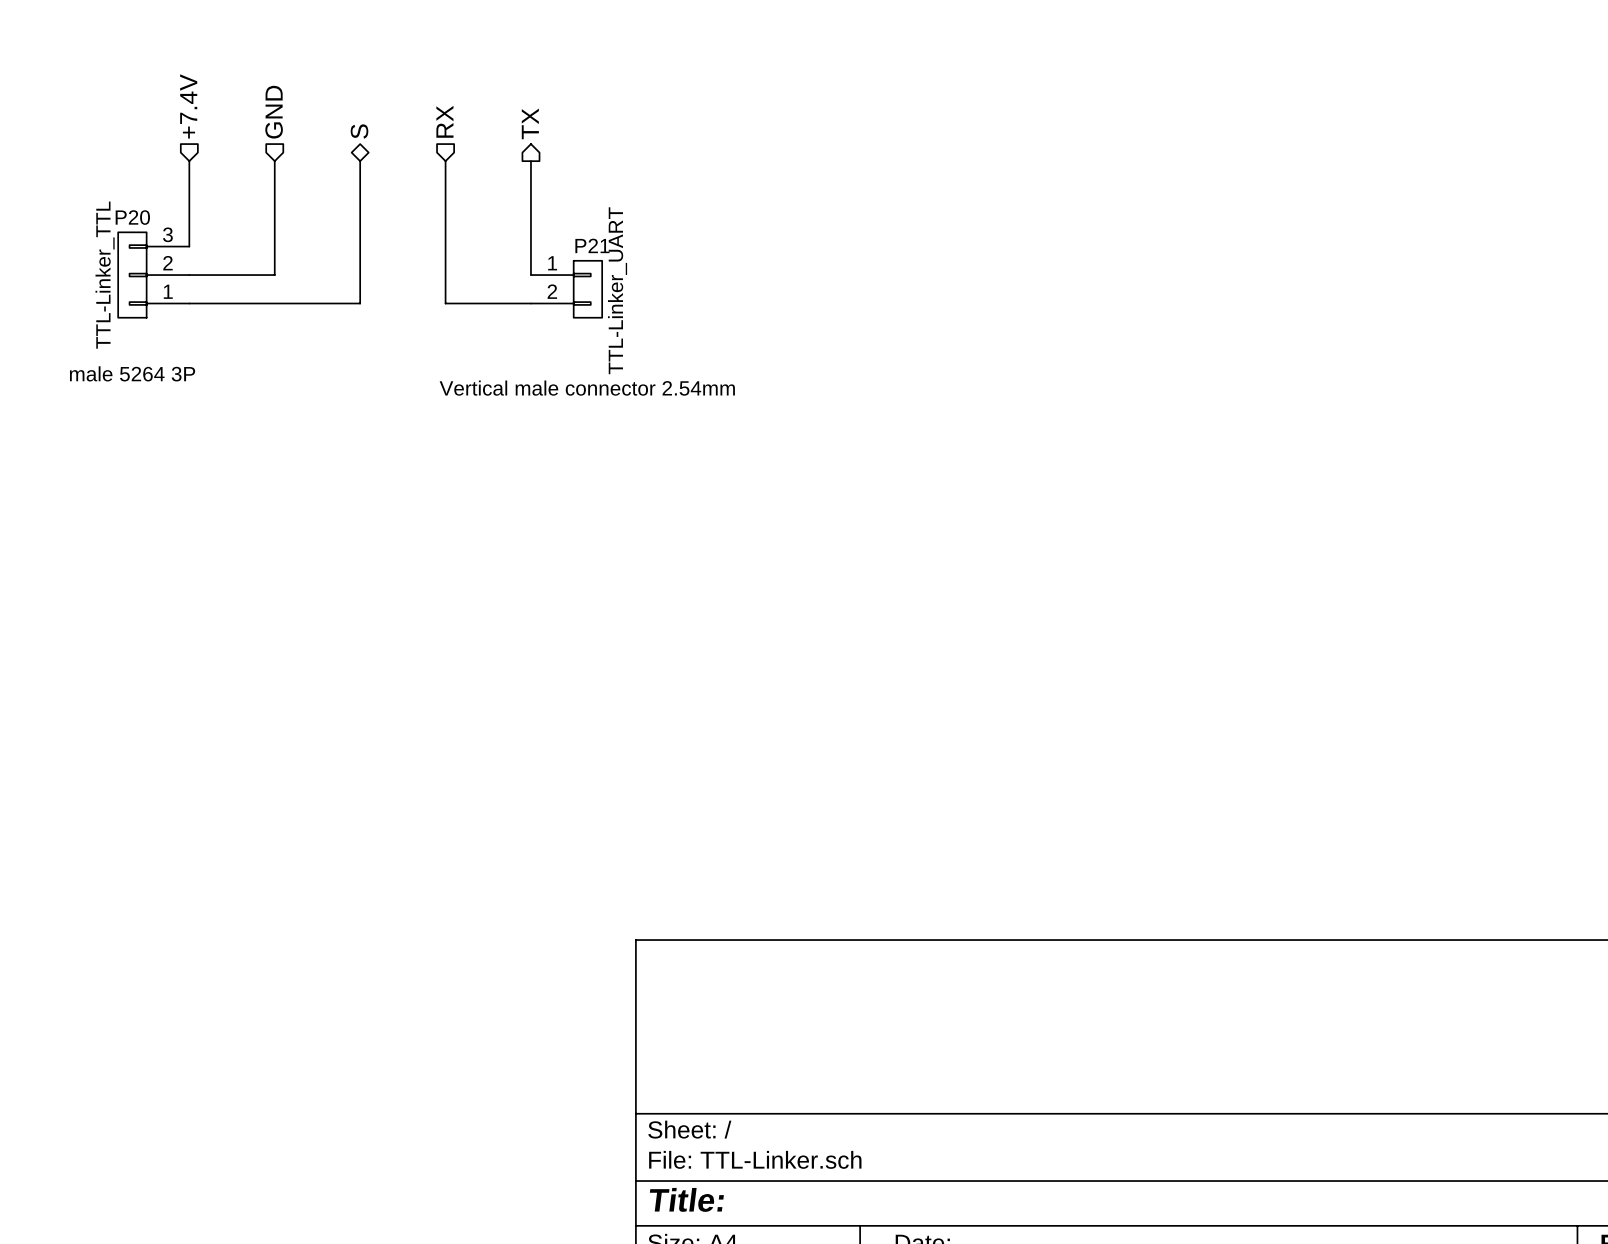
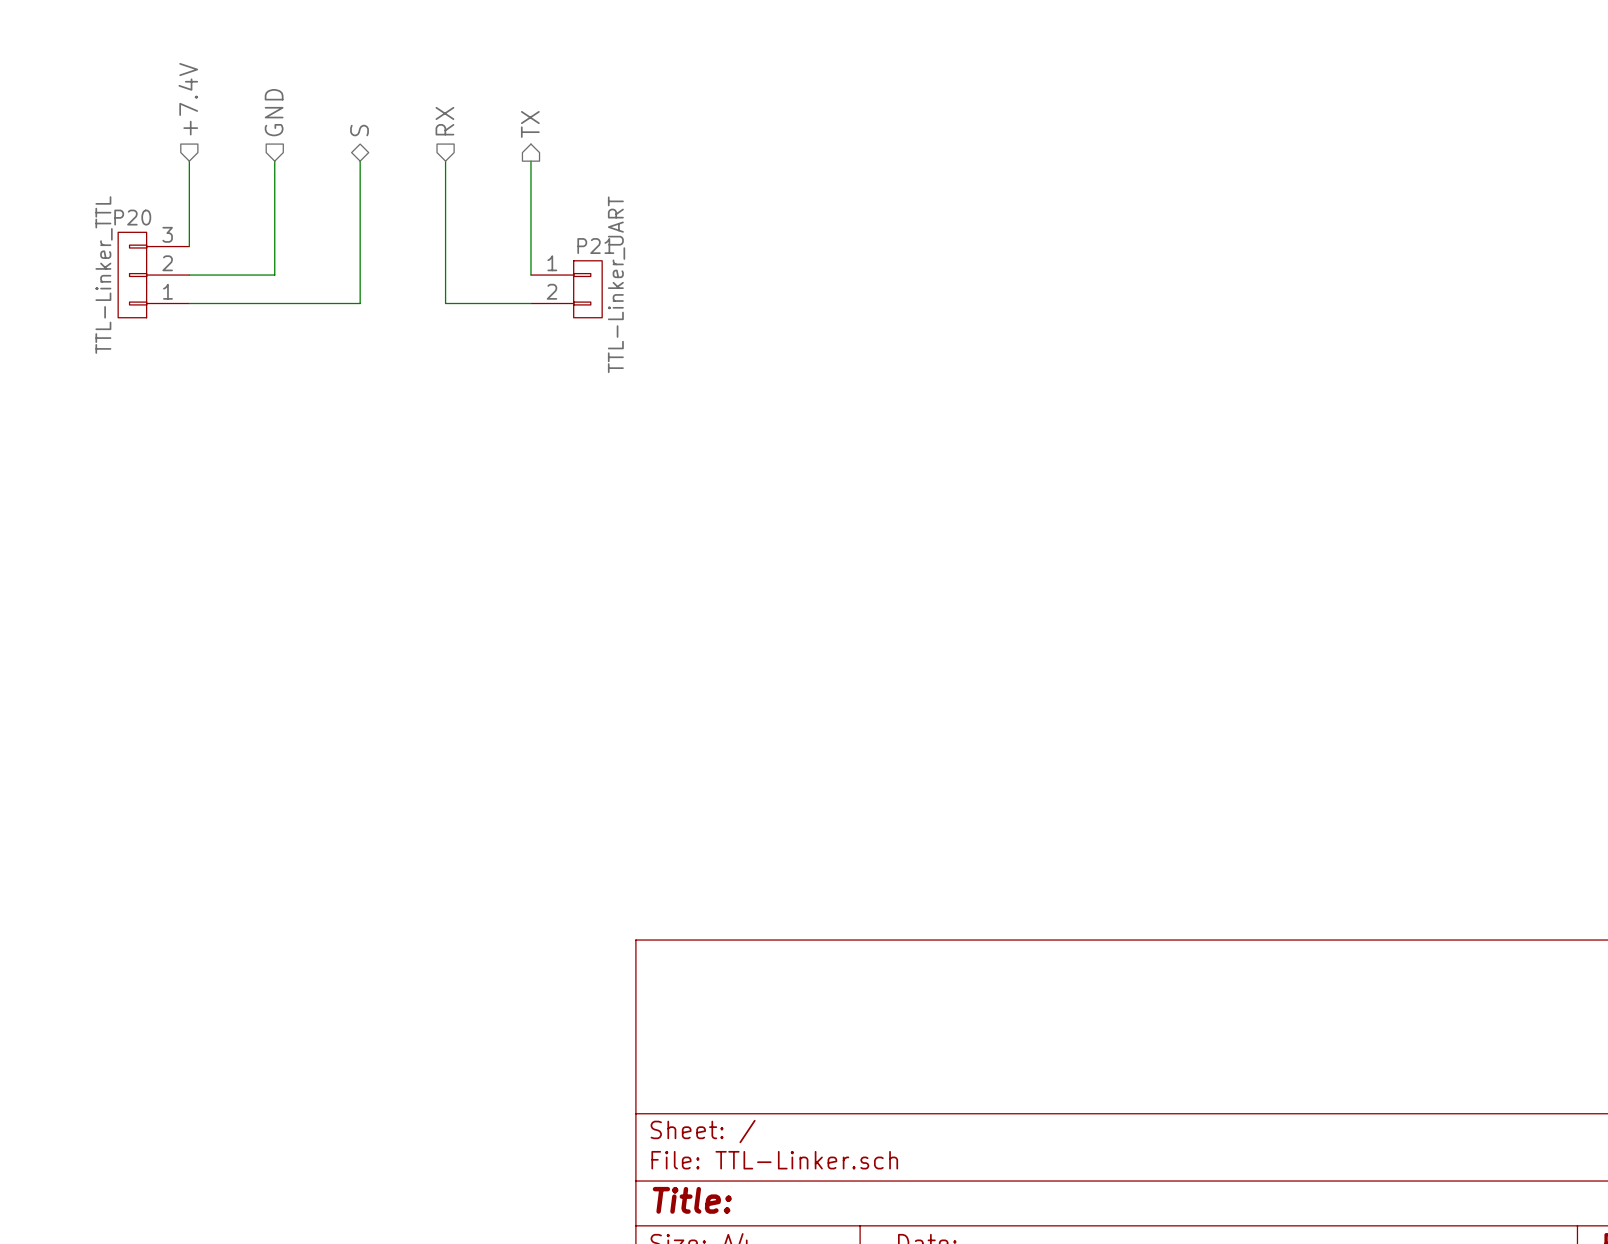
P20 text: male 5264 3P (132, 373) -> none
P21 text: Vertical male connector 2.54mm (587, 388) -> none

